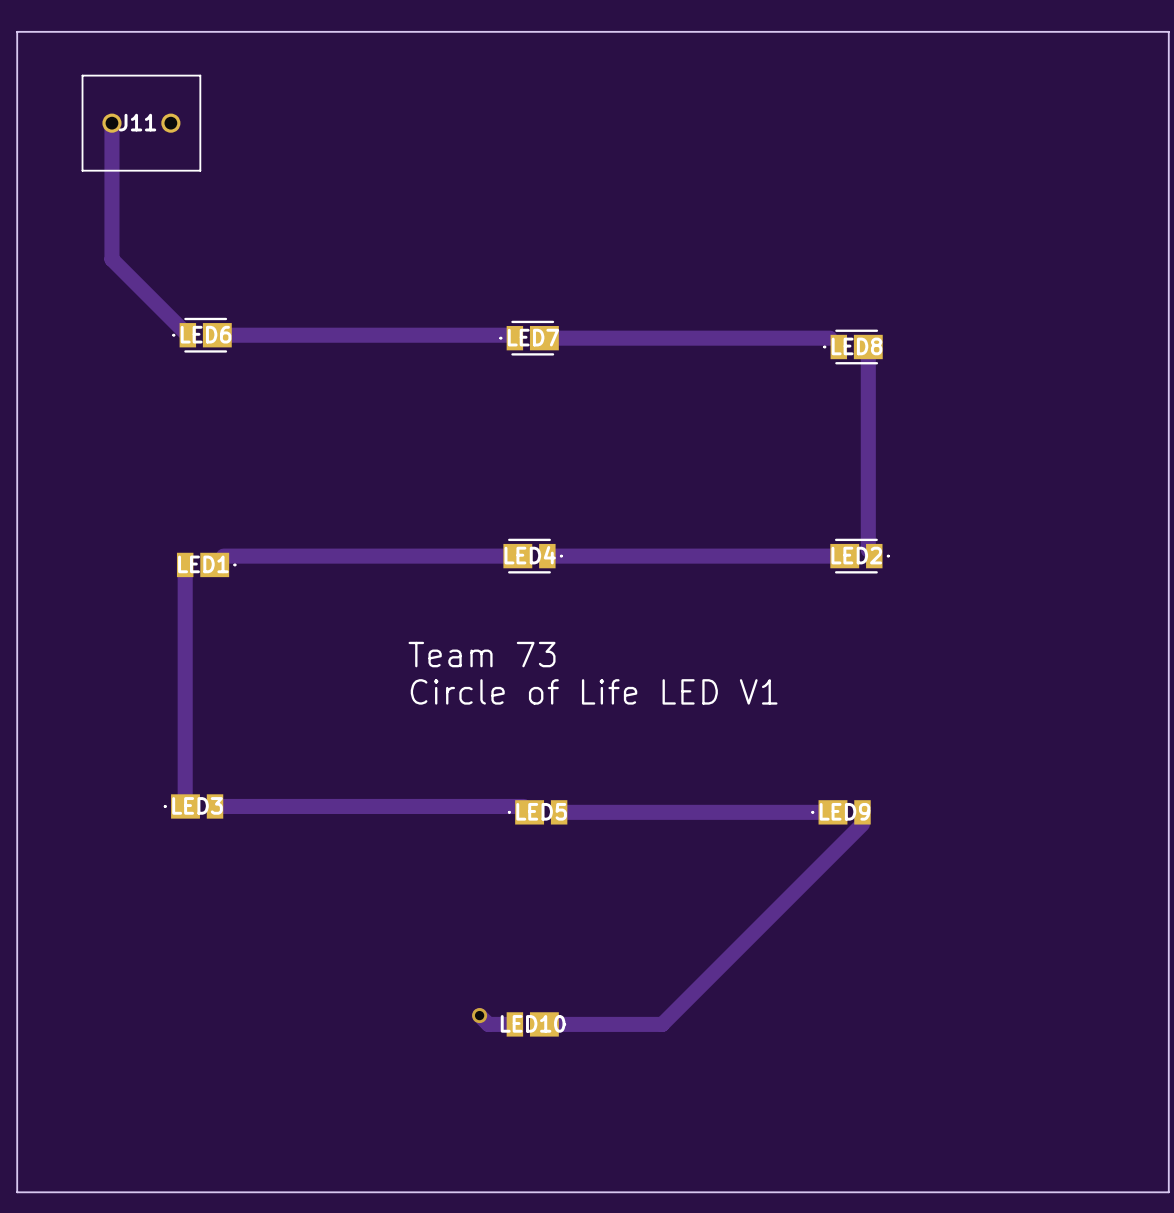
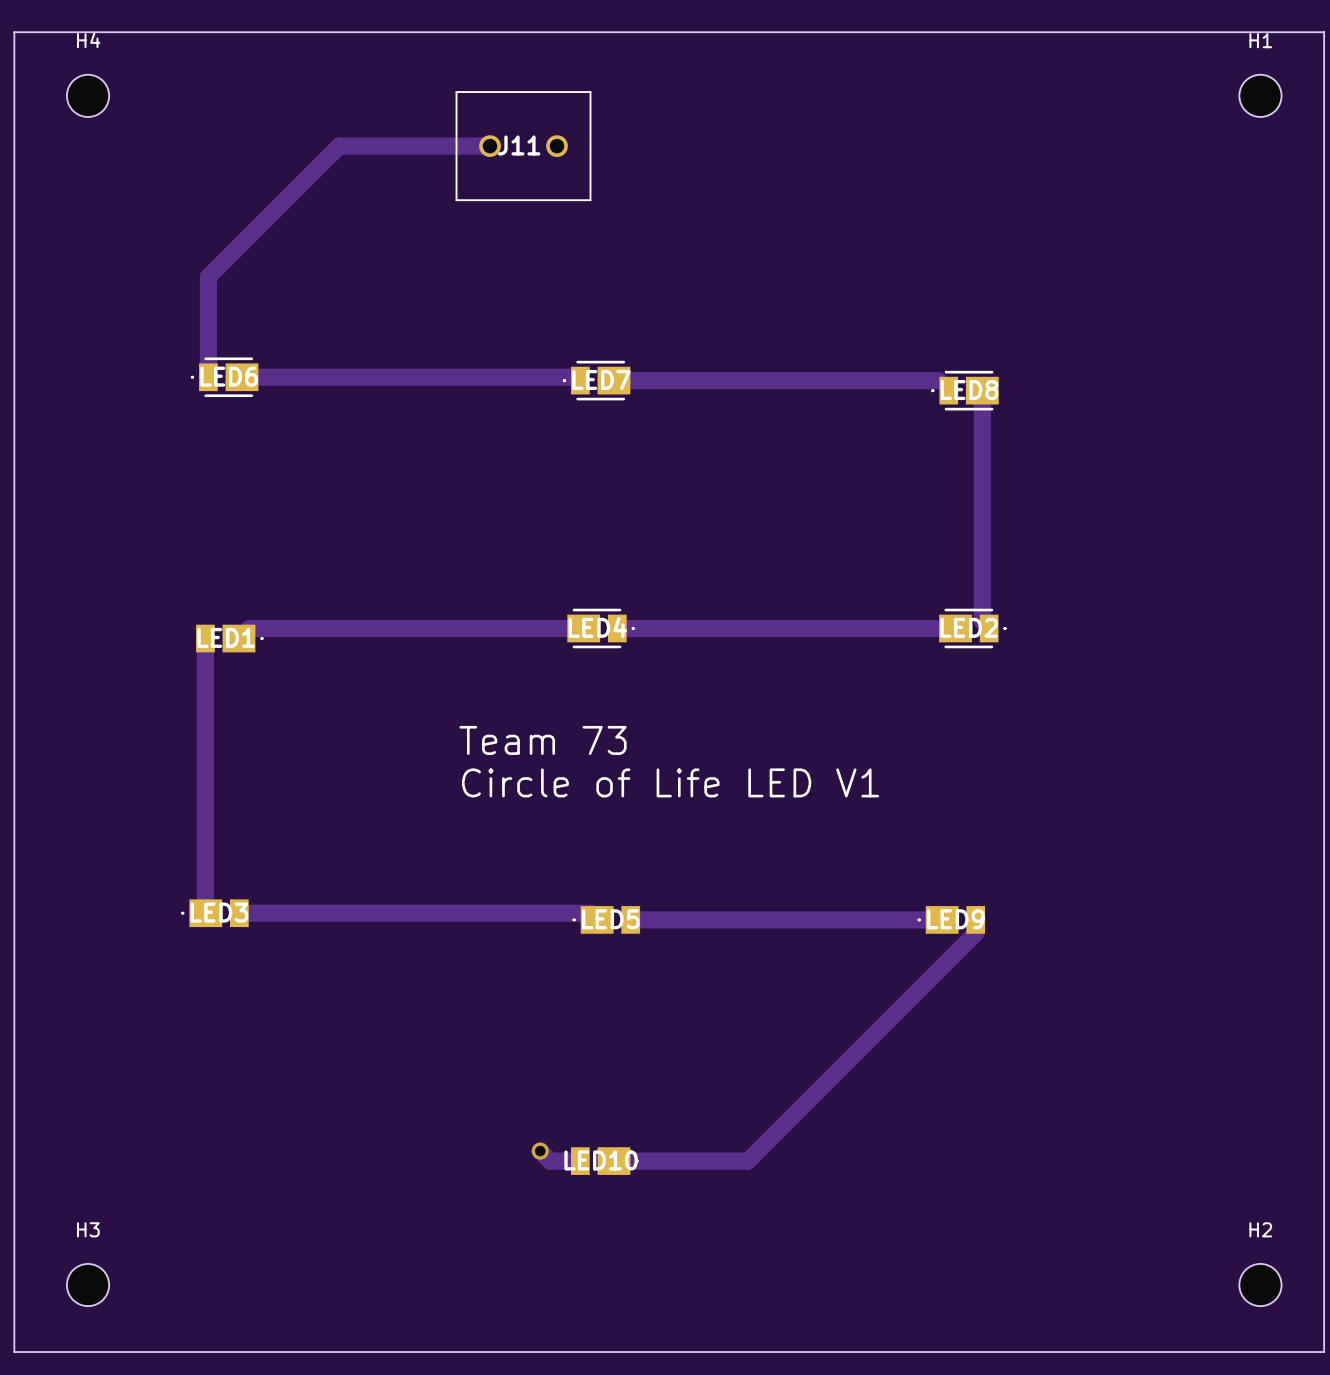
H4: none -> (88, 95)
H1: none -> (1260, 95)
track: (111, 123) (111, 259) (187, 335) -> (490, 146) (339, 146) (208, 276) (208, 377)
J11 position: (141, 123) -> (523, 146)
H3: none -> (88, 1285)
H2: none -> (1260, 1285)

